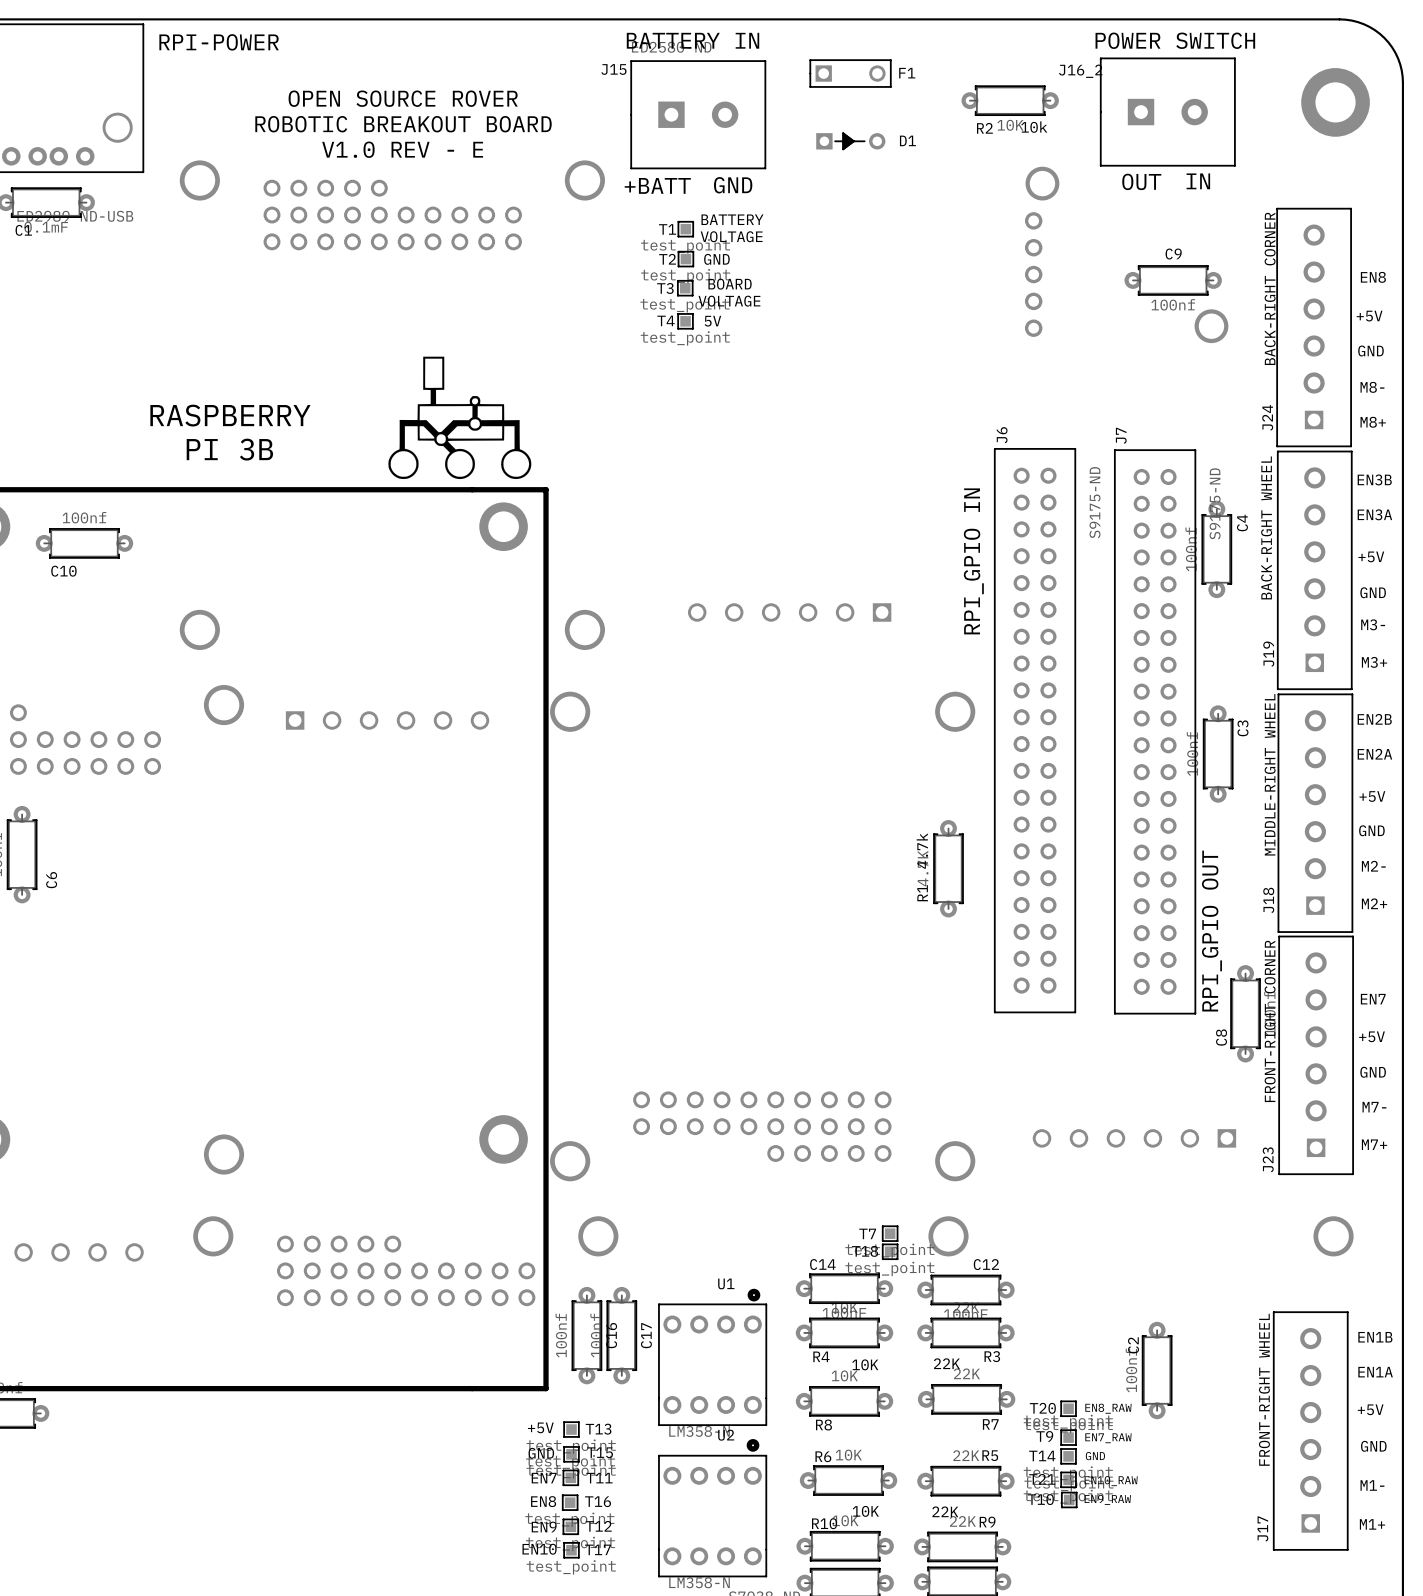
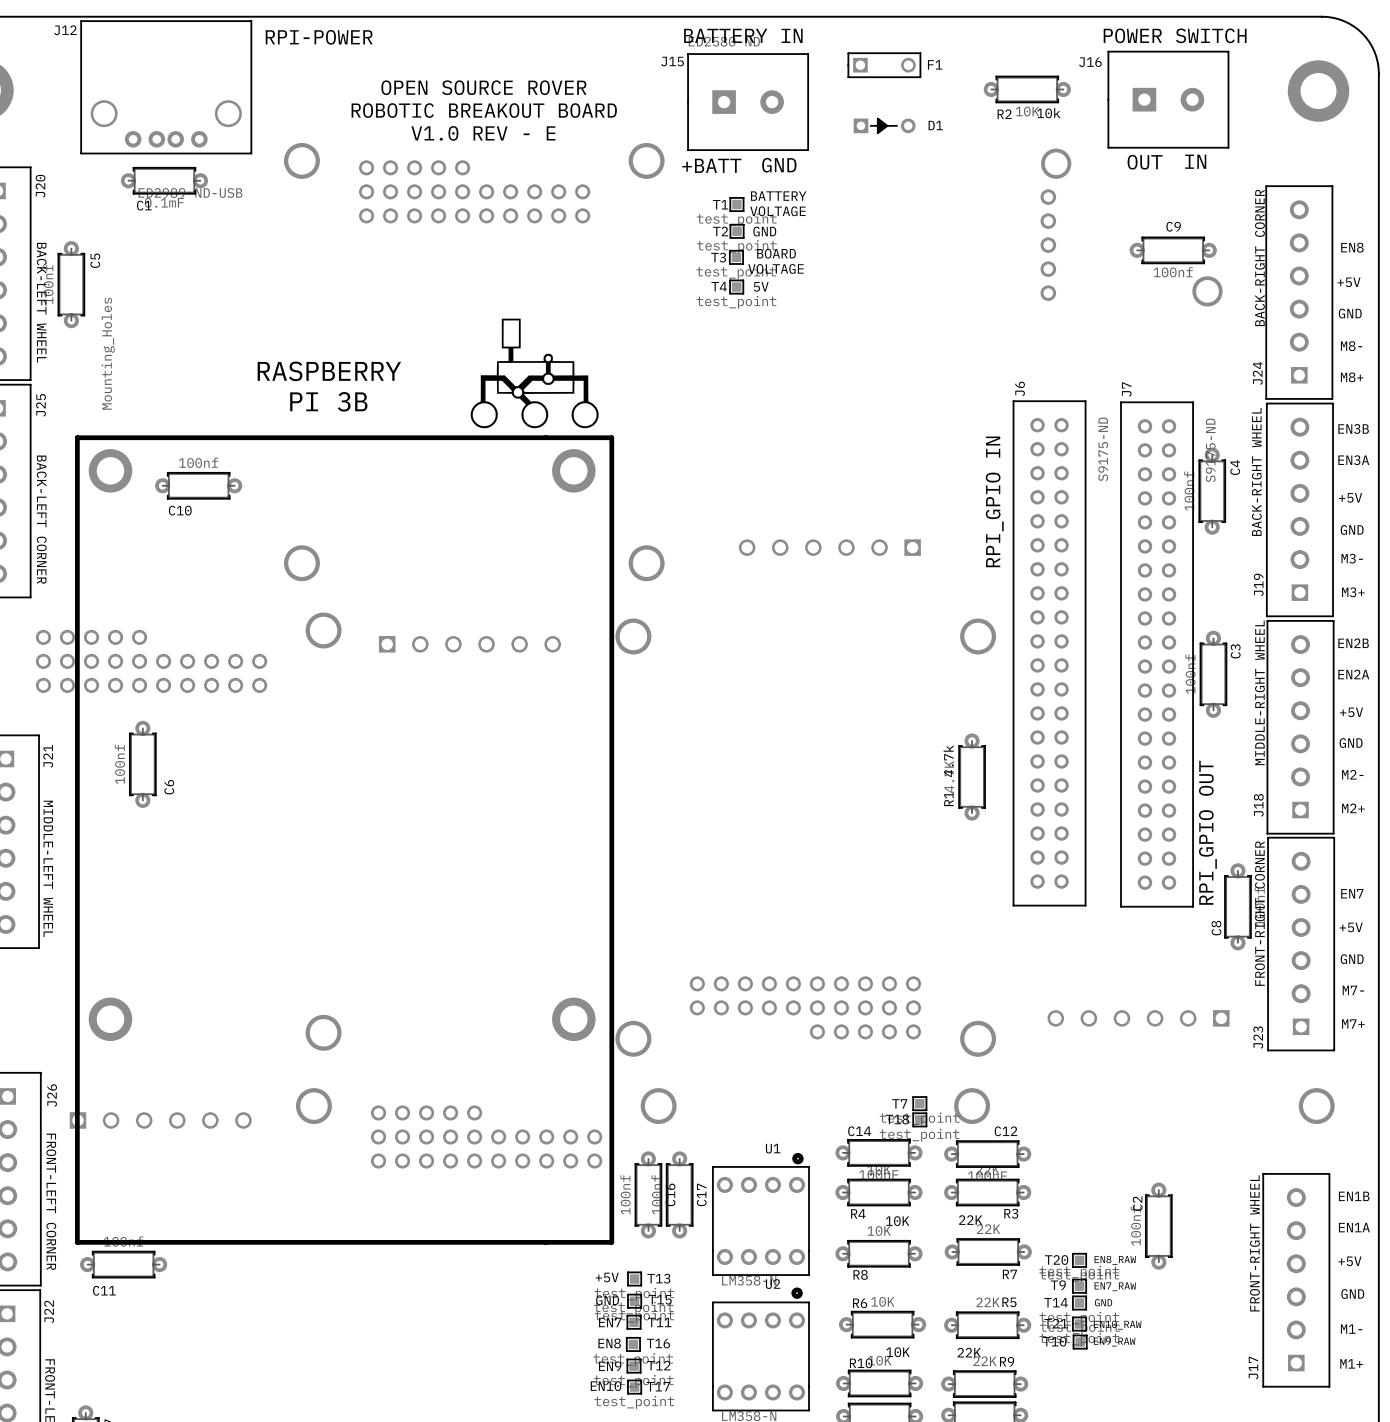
J16_2 name: J16_2 (1080, 71) -> J16 (1090, 62)

